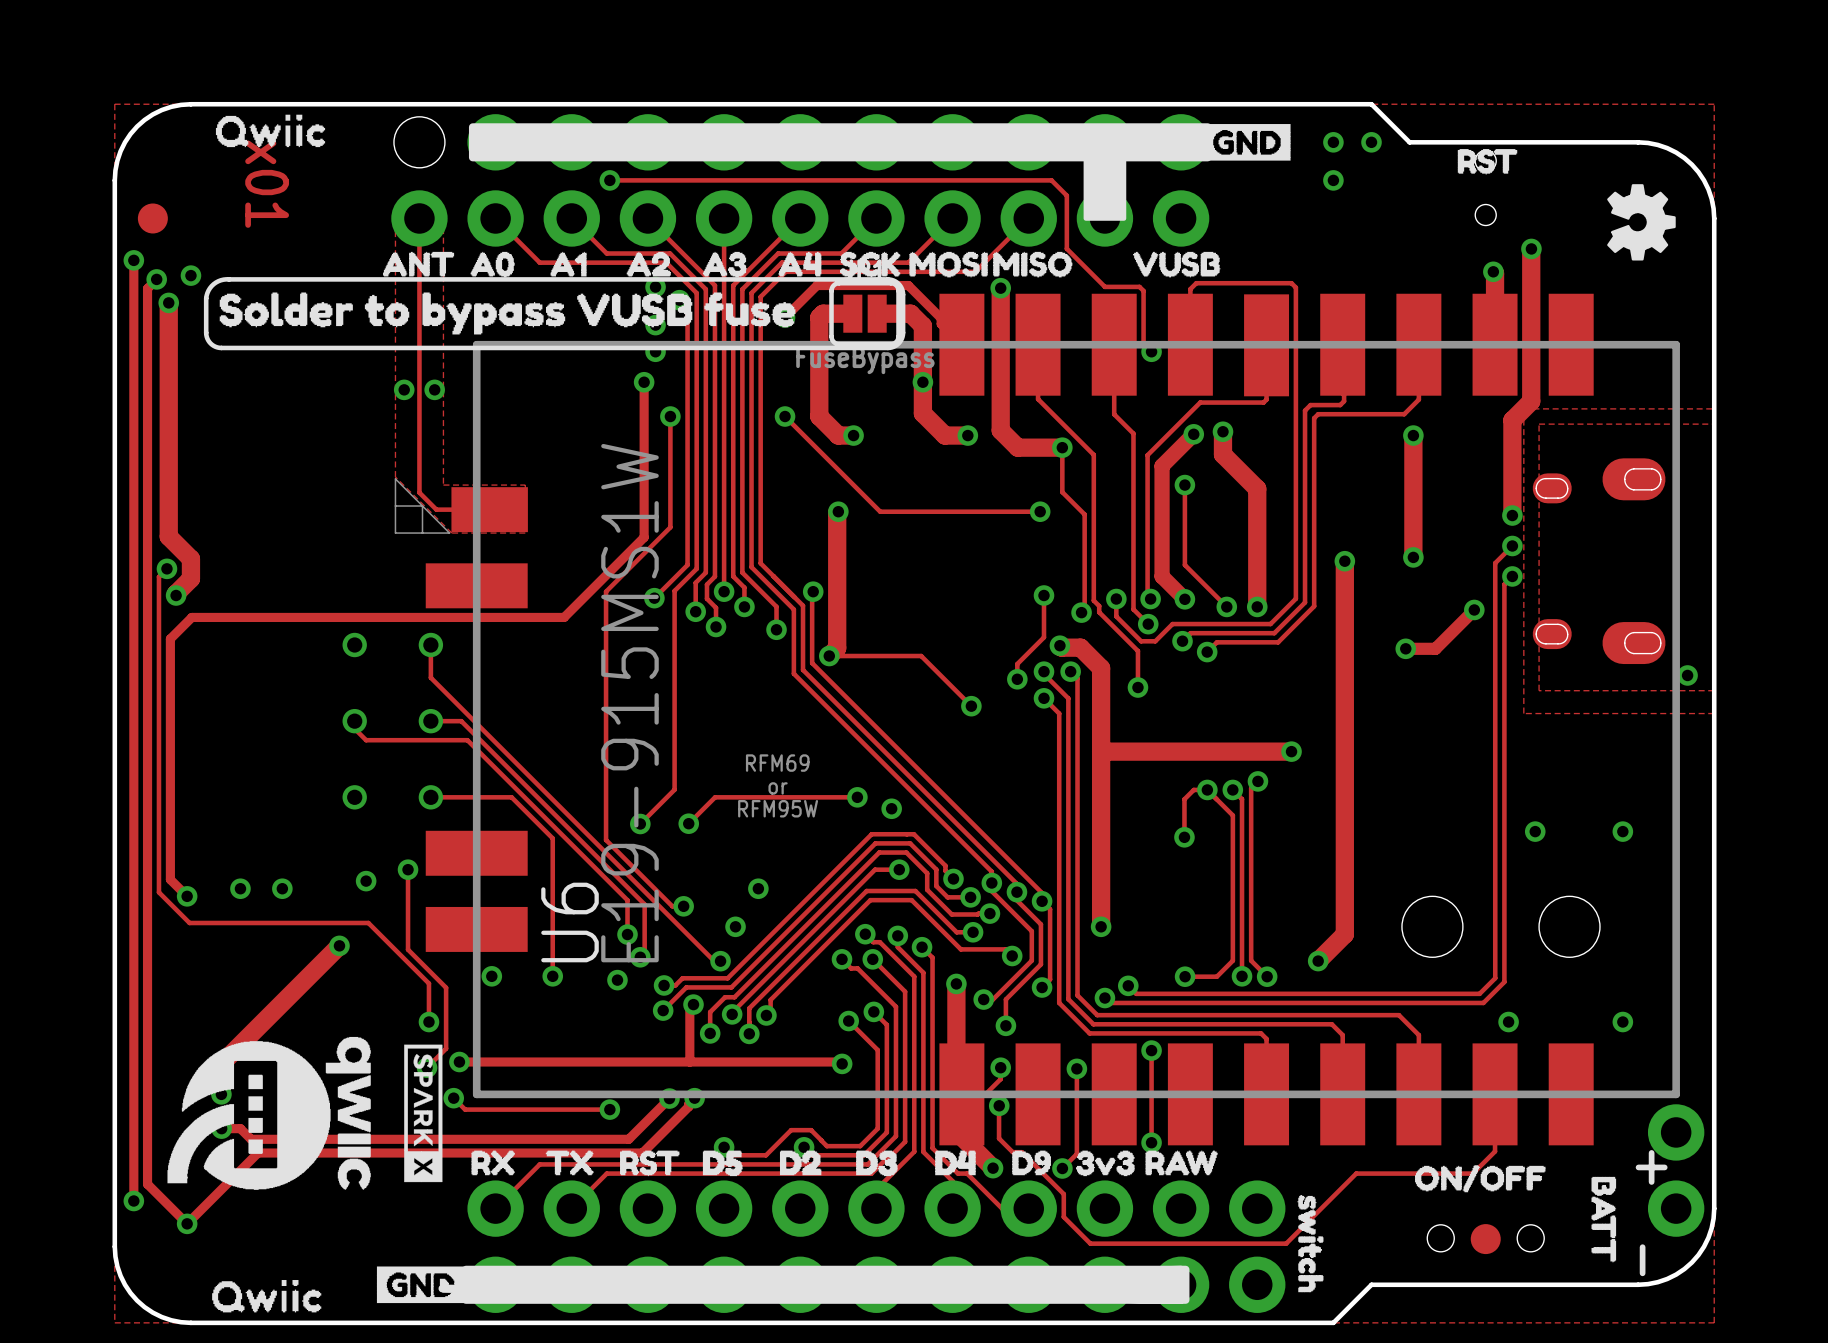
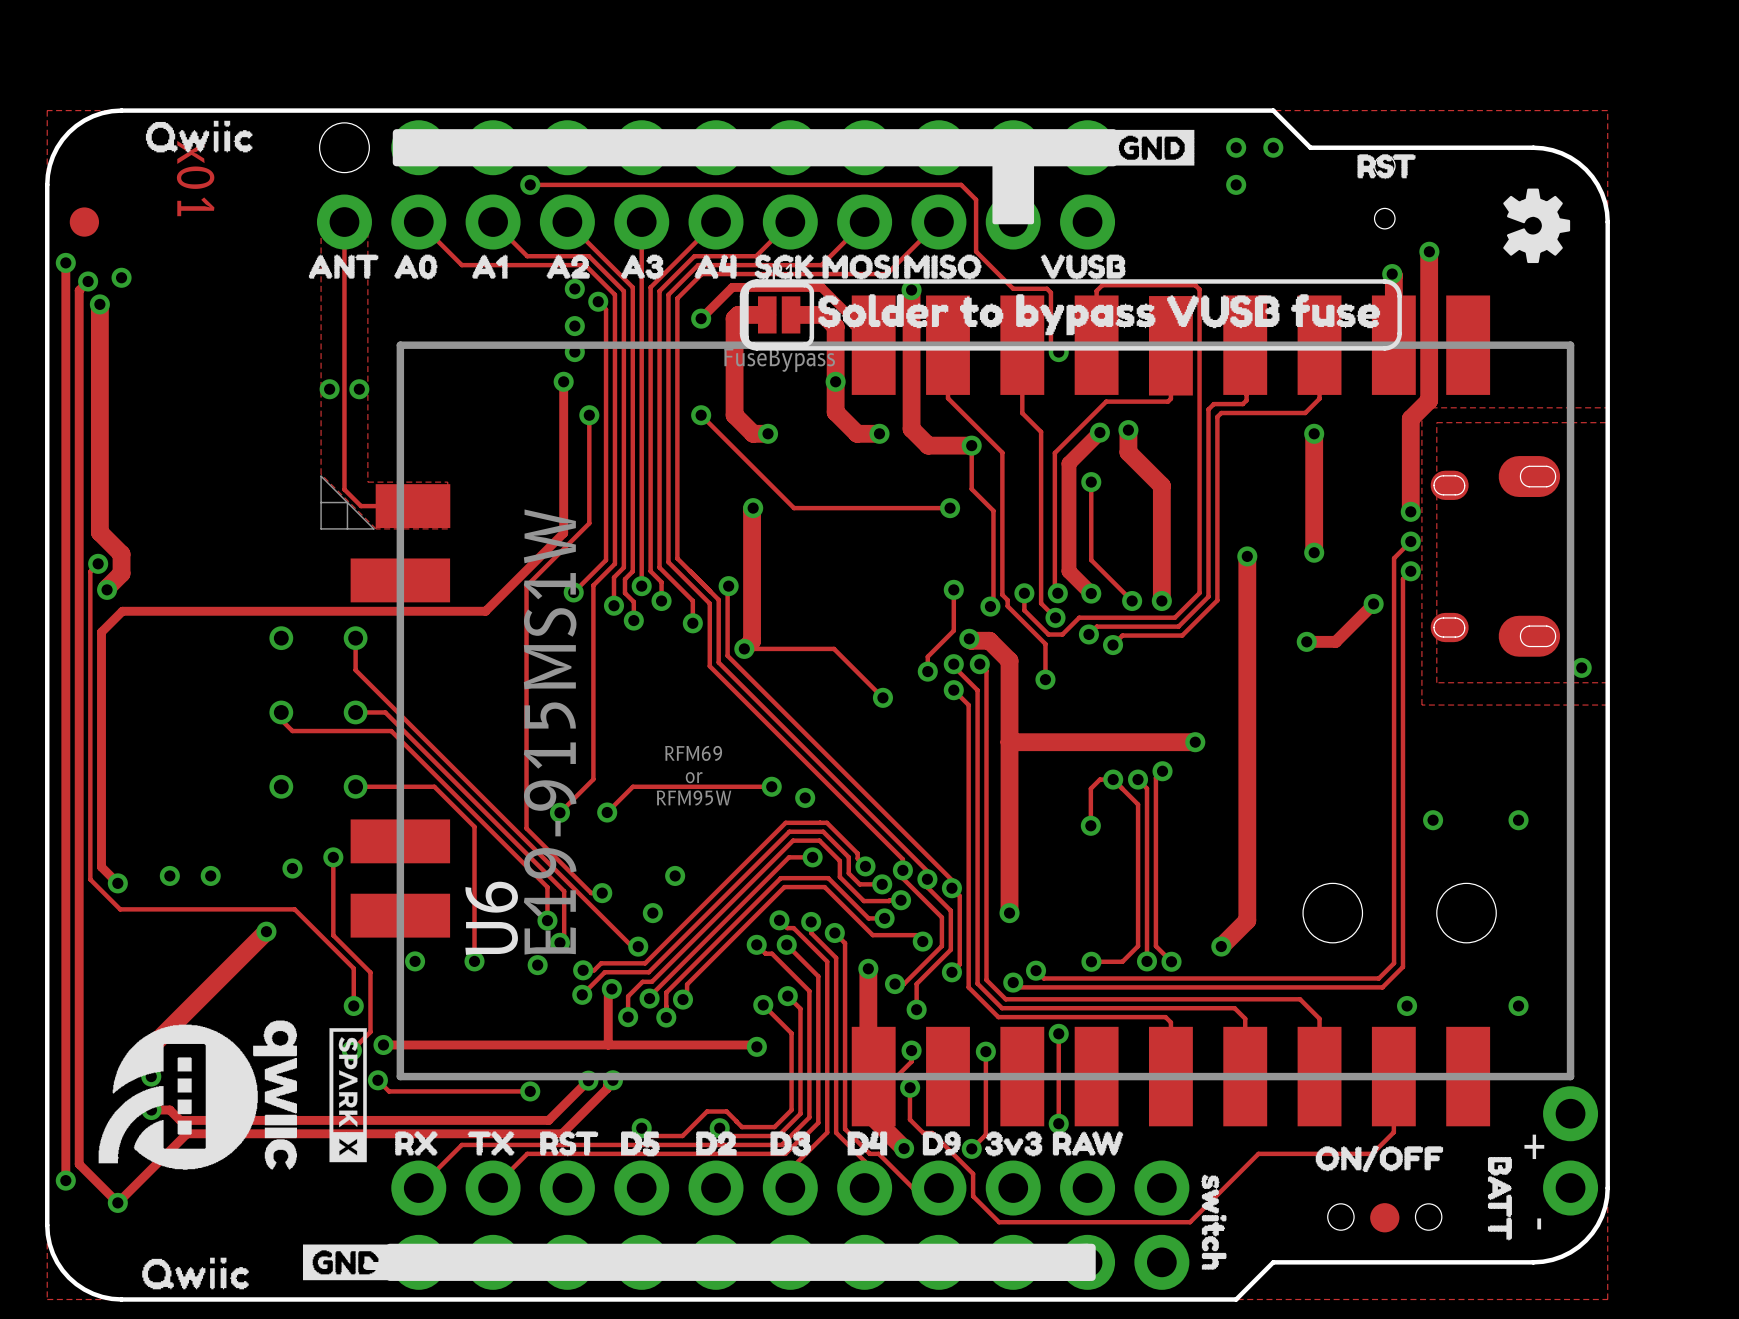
line: (842, 279) (226, 279) (218, 281) (211, 286) (206, 298) (206, 336) (212, 344) (219, 347) (842, 347) -> (756, 281) (746, 285) (742, 296) (742, 337) (747, 345) (756, 348)
line: (887, 279) (898, 283) (903, 294) (902, 336) (897, 344) (887, 347) -> (801, 281) (1384, 281) (1395, 285) (1399, 296) (1399, 337) (1393, 345) (1386, 348) (801, 348)
drawing position: (507, 313) -> (1099, 314)

